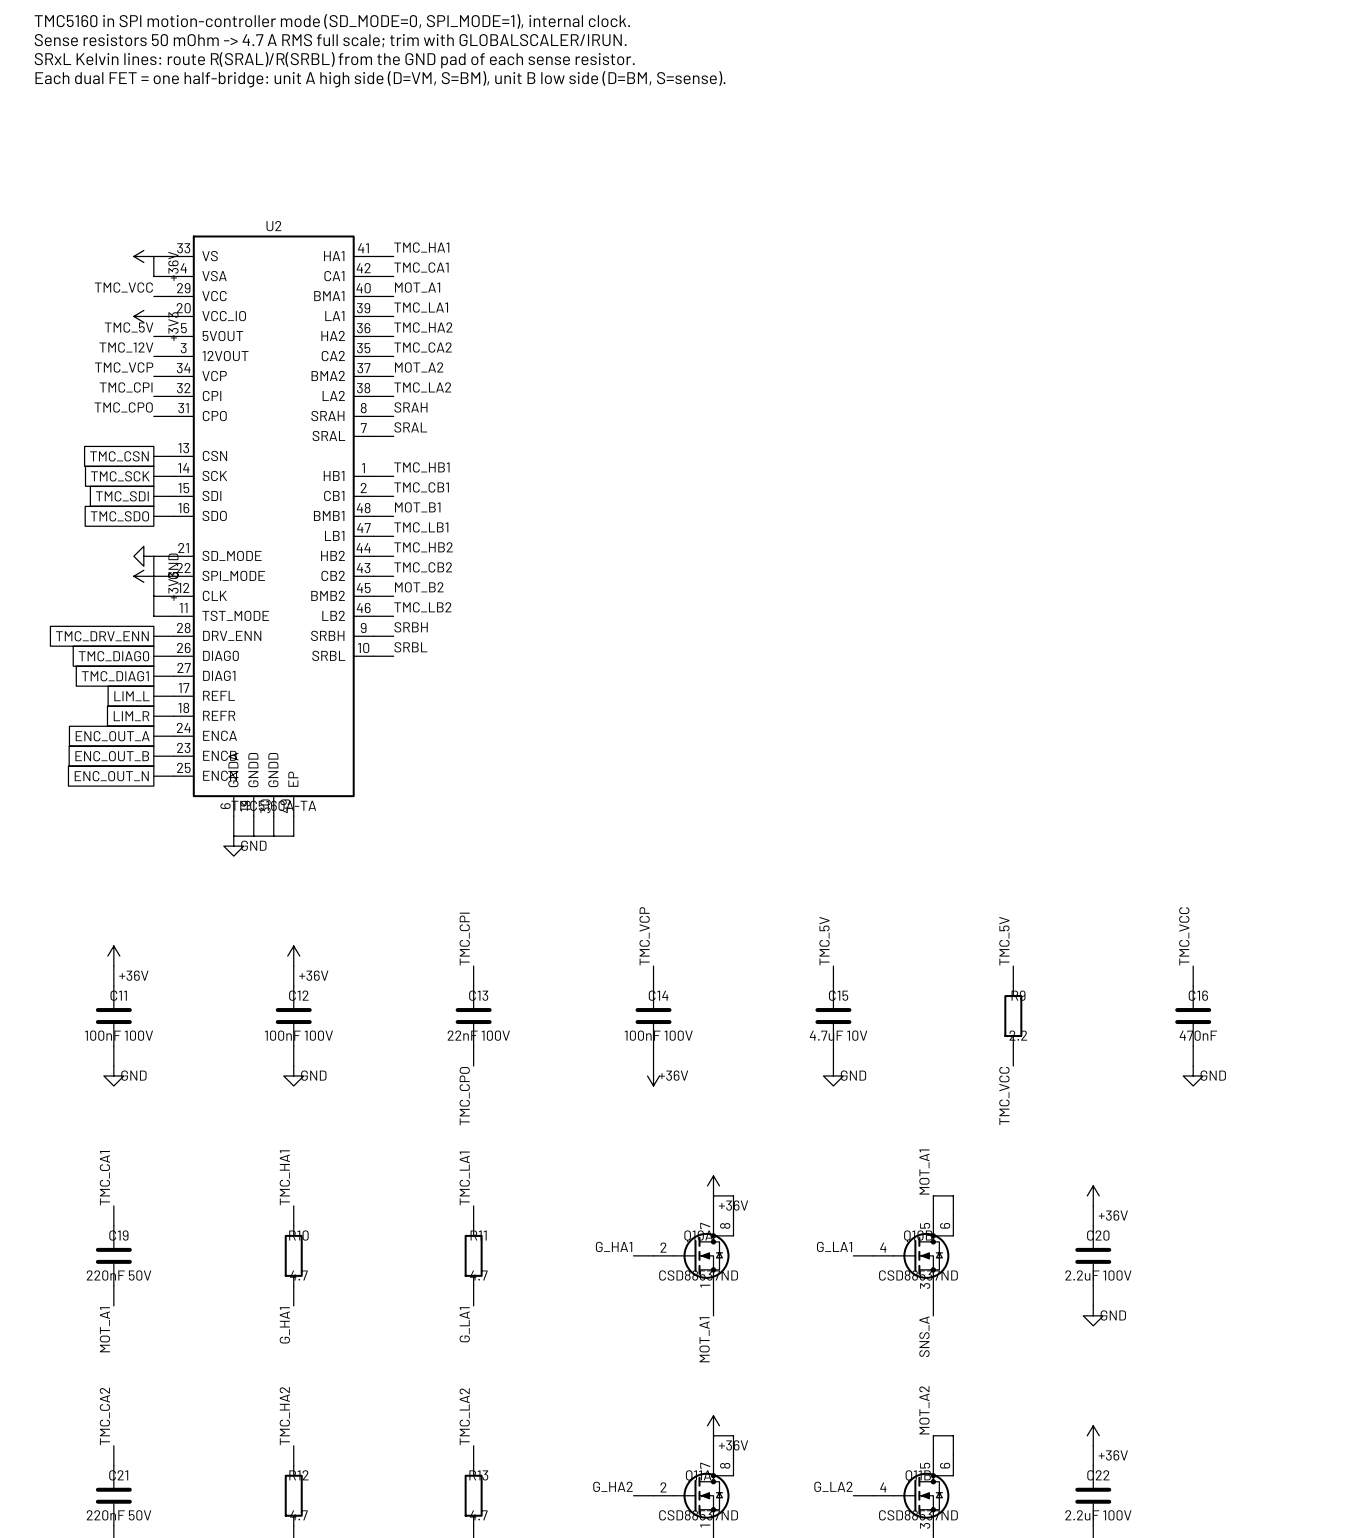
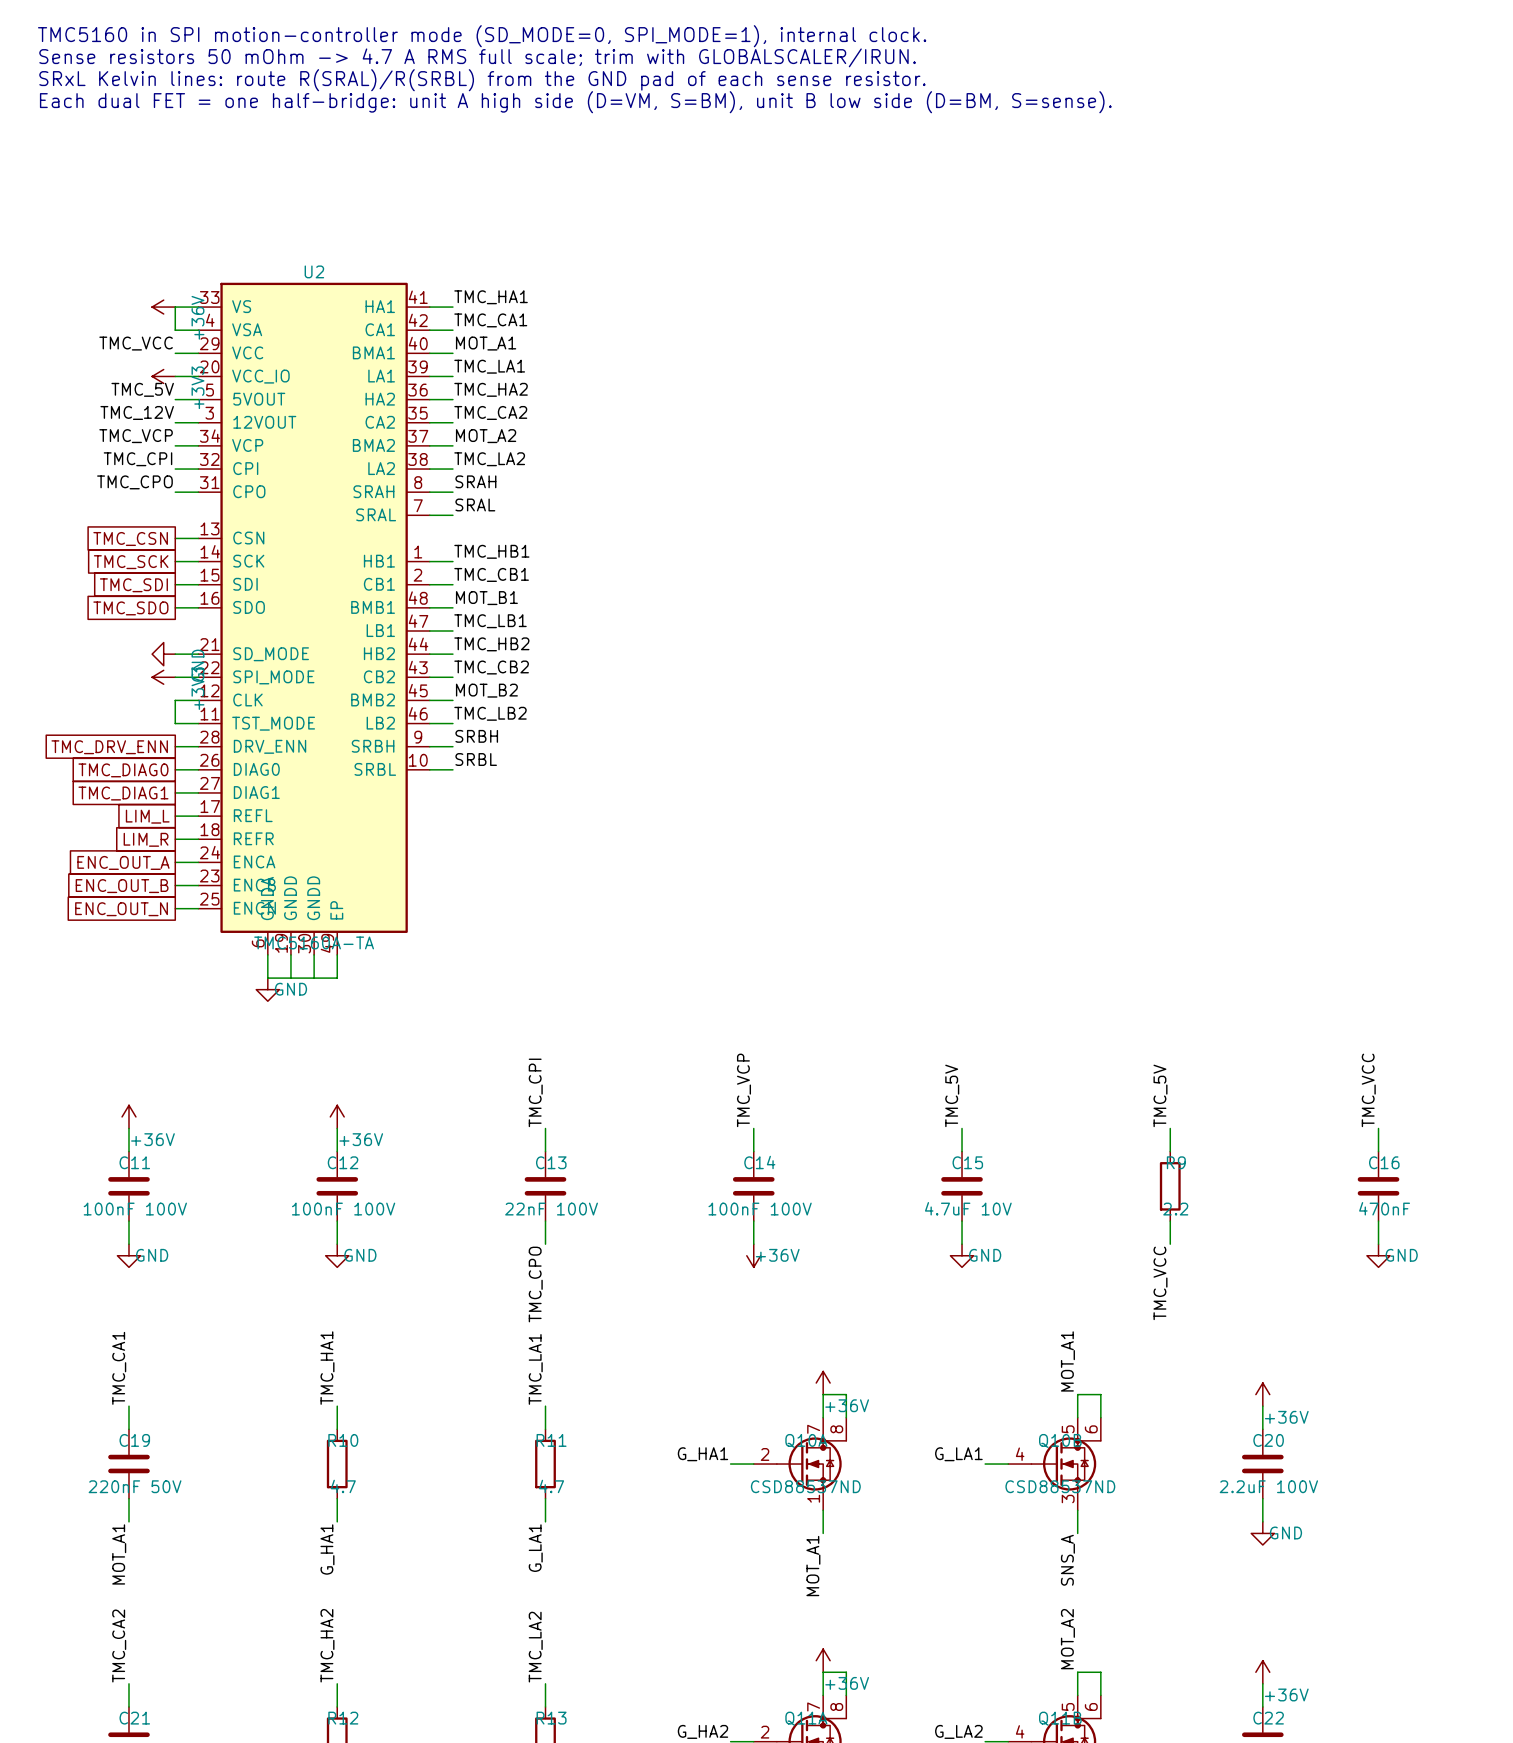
wire: (153, 556) (153, 596) -> none

